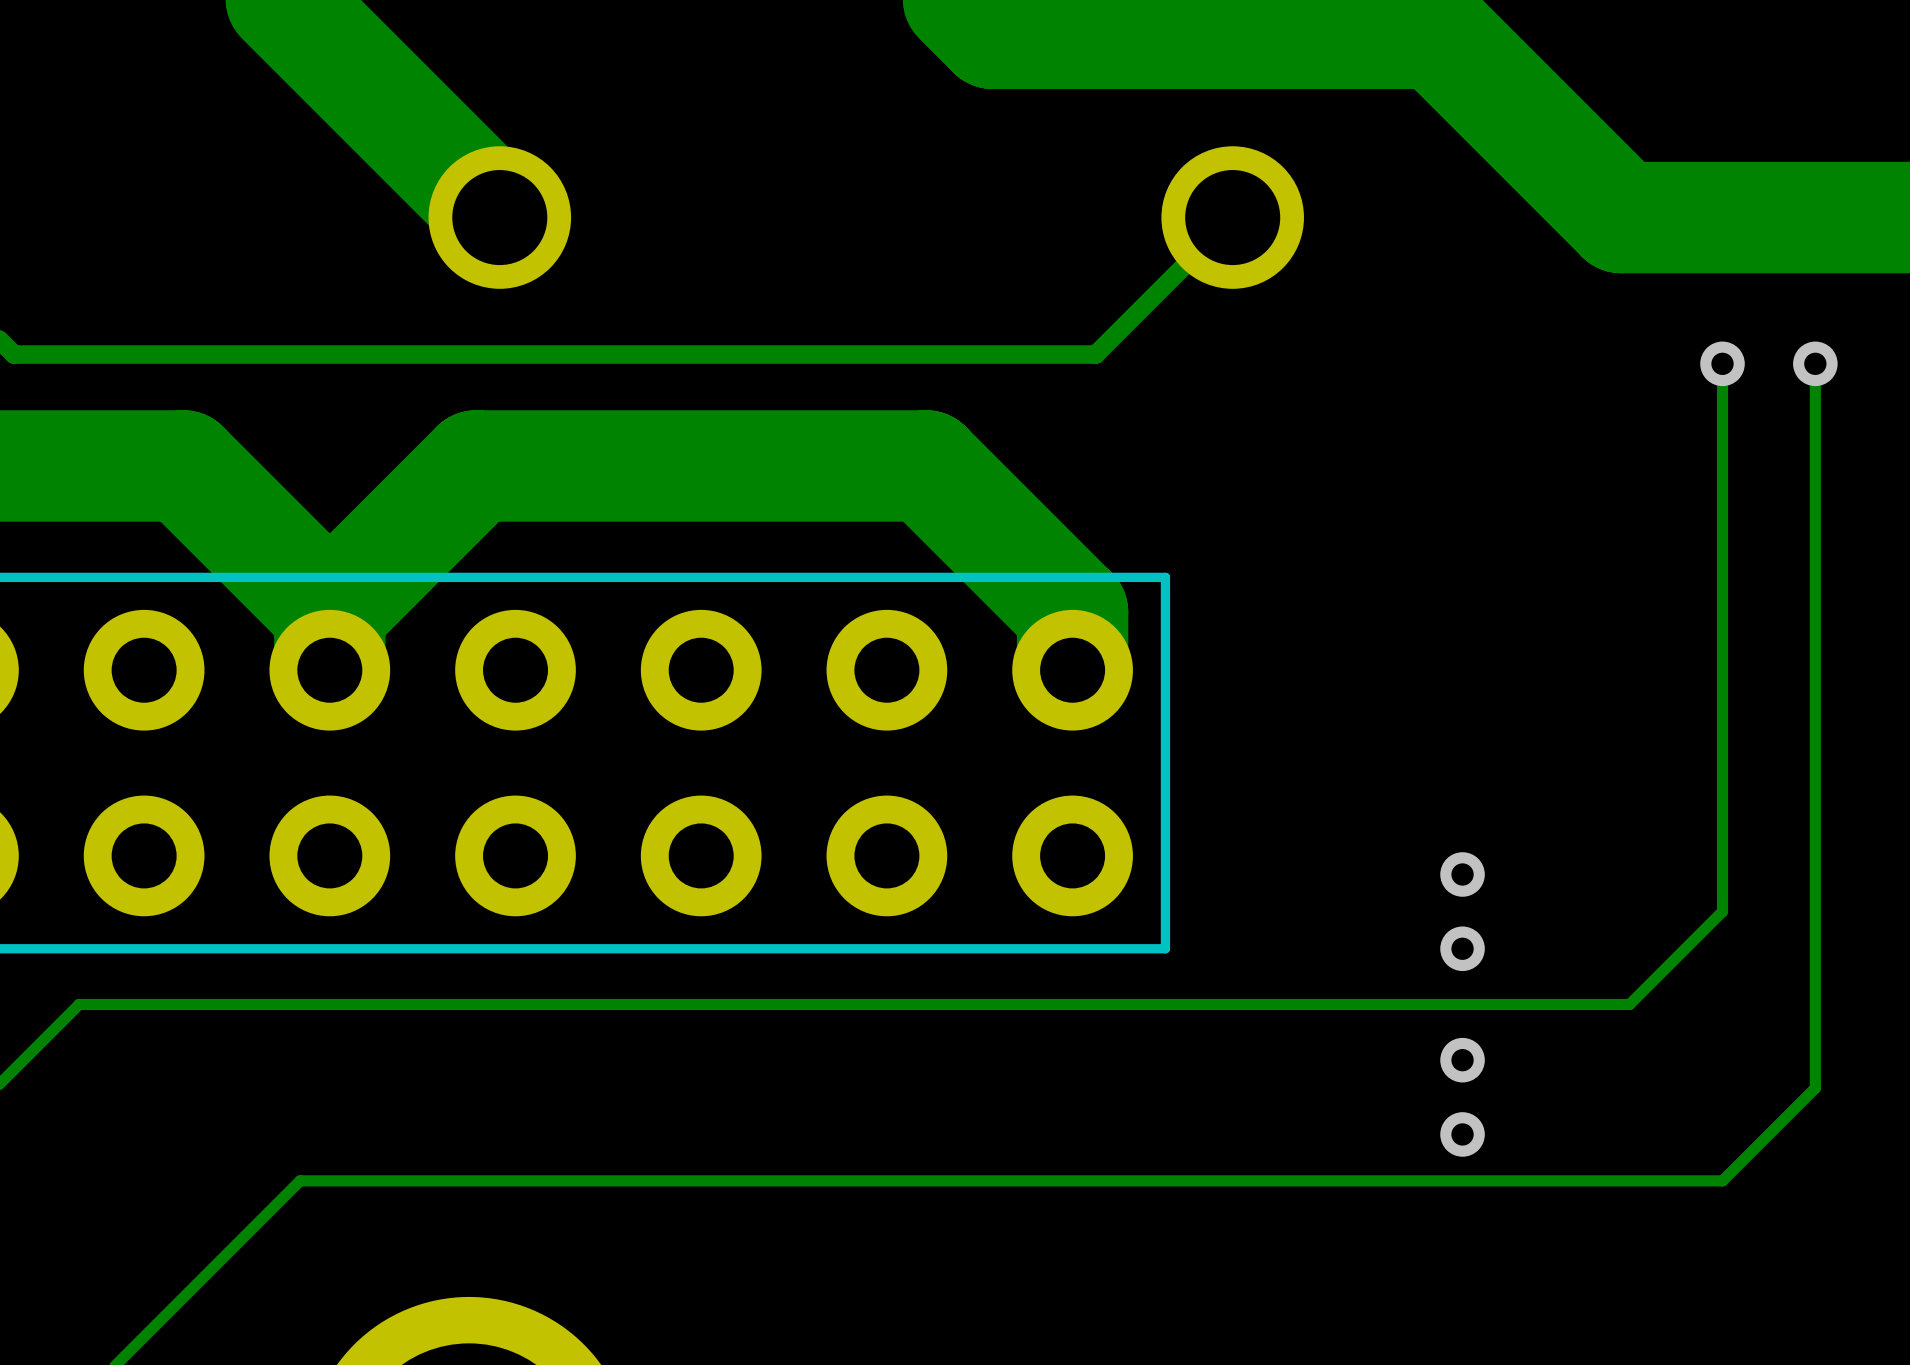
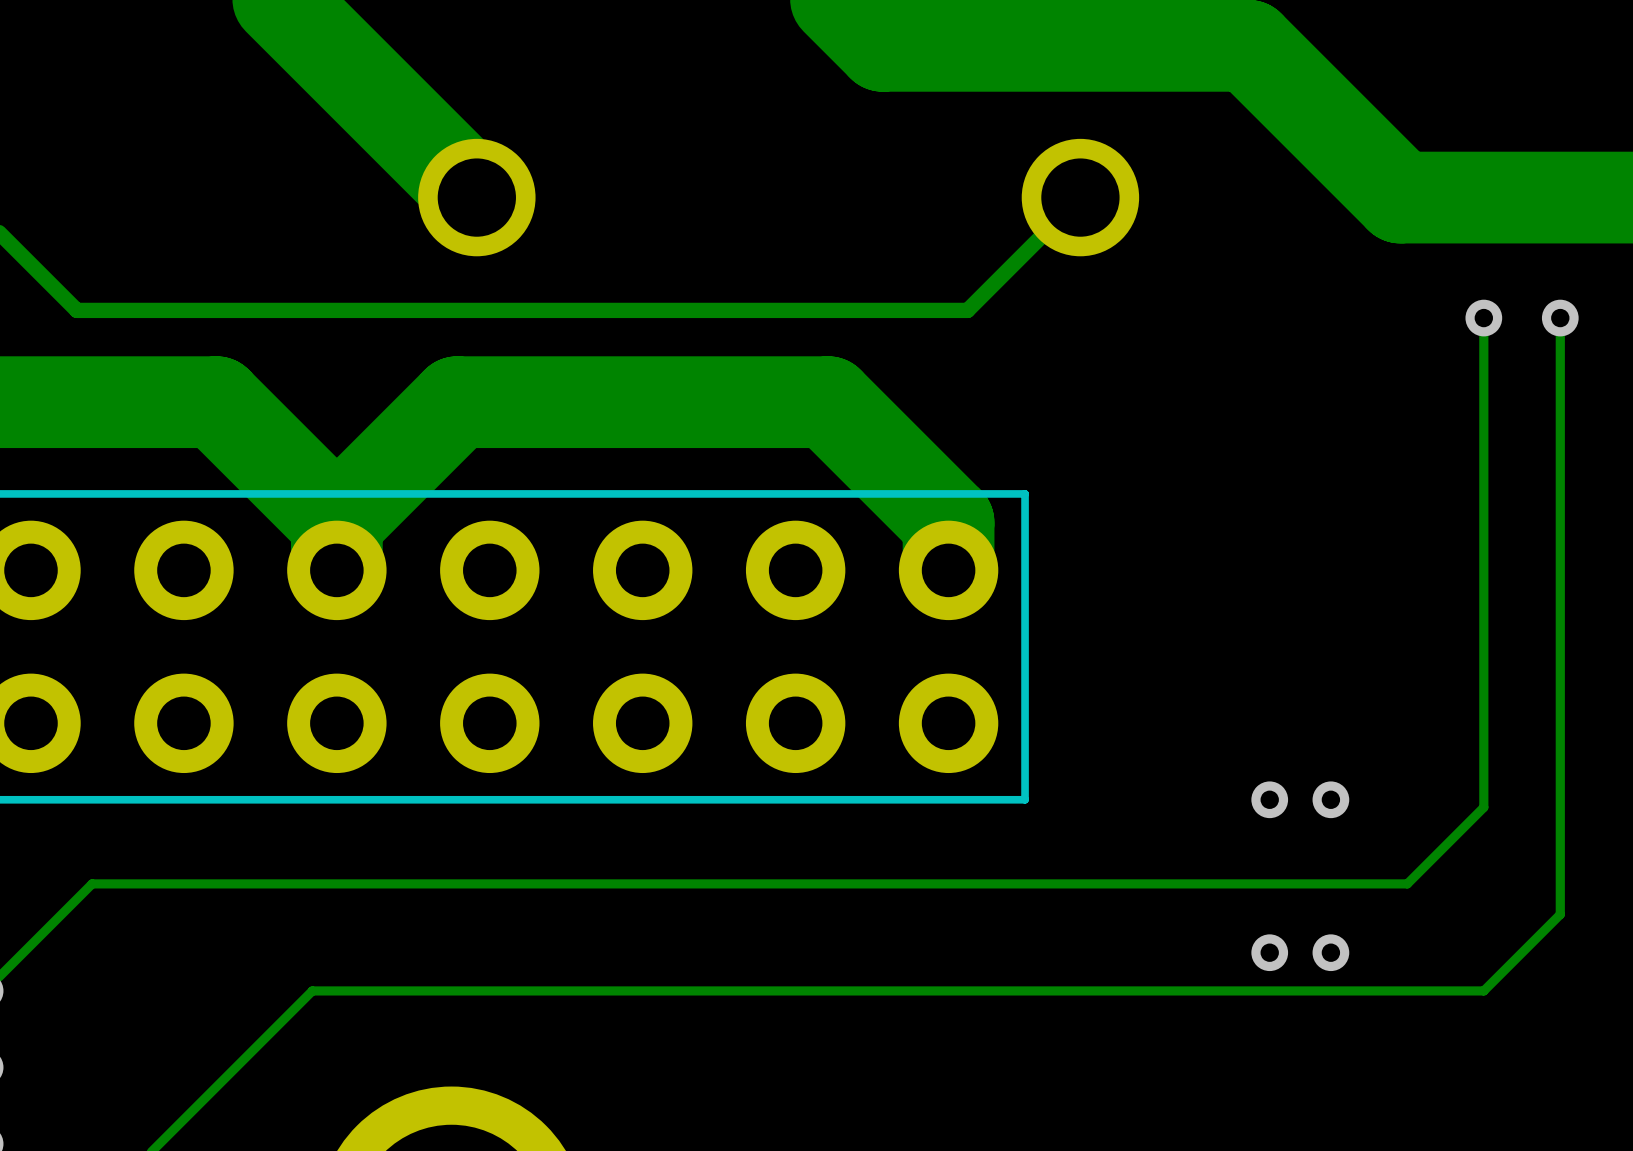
via: (1462, 874) -> none
track: (1722, 911) (1629, 1004) (79, 1004) (32, 1050) -> (1483, 769) (1483, 807) (1407, 883) (92, 883)
via: none -> (1330, 799)
via: (1462, 1060) -> none
via: none -> (1330, 952)

